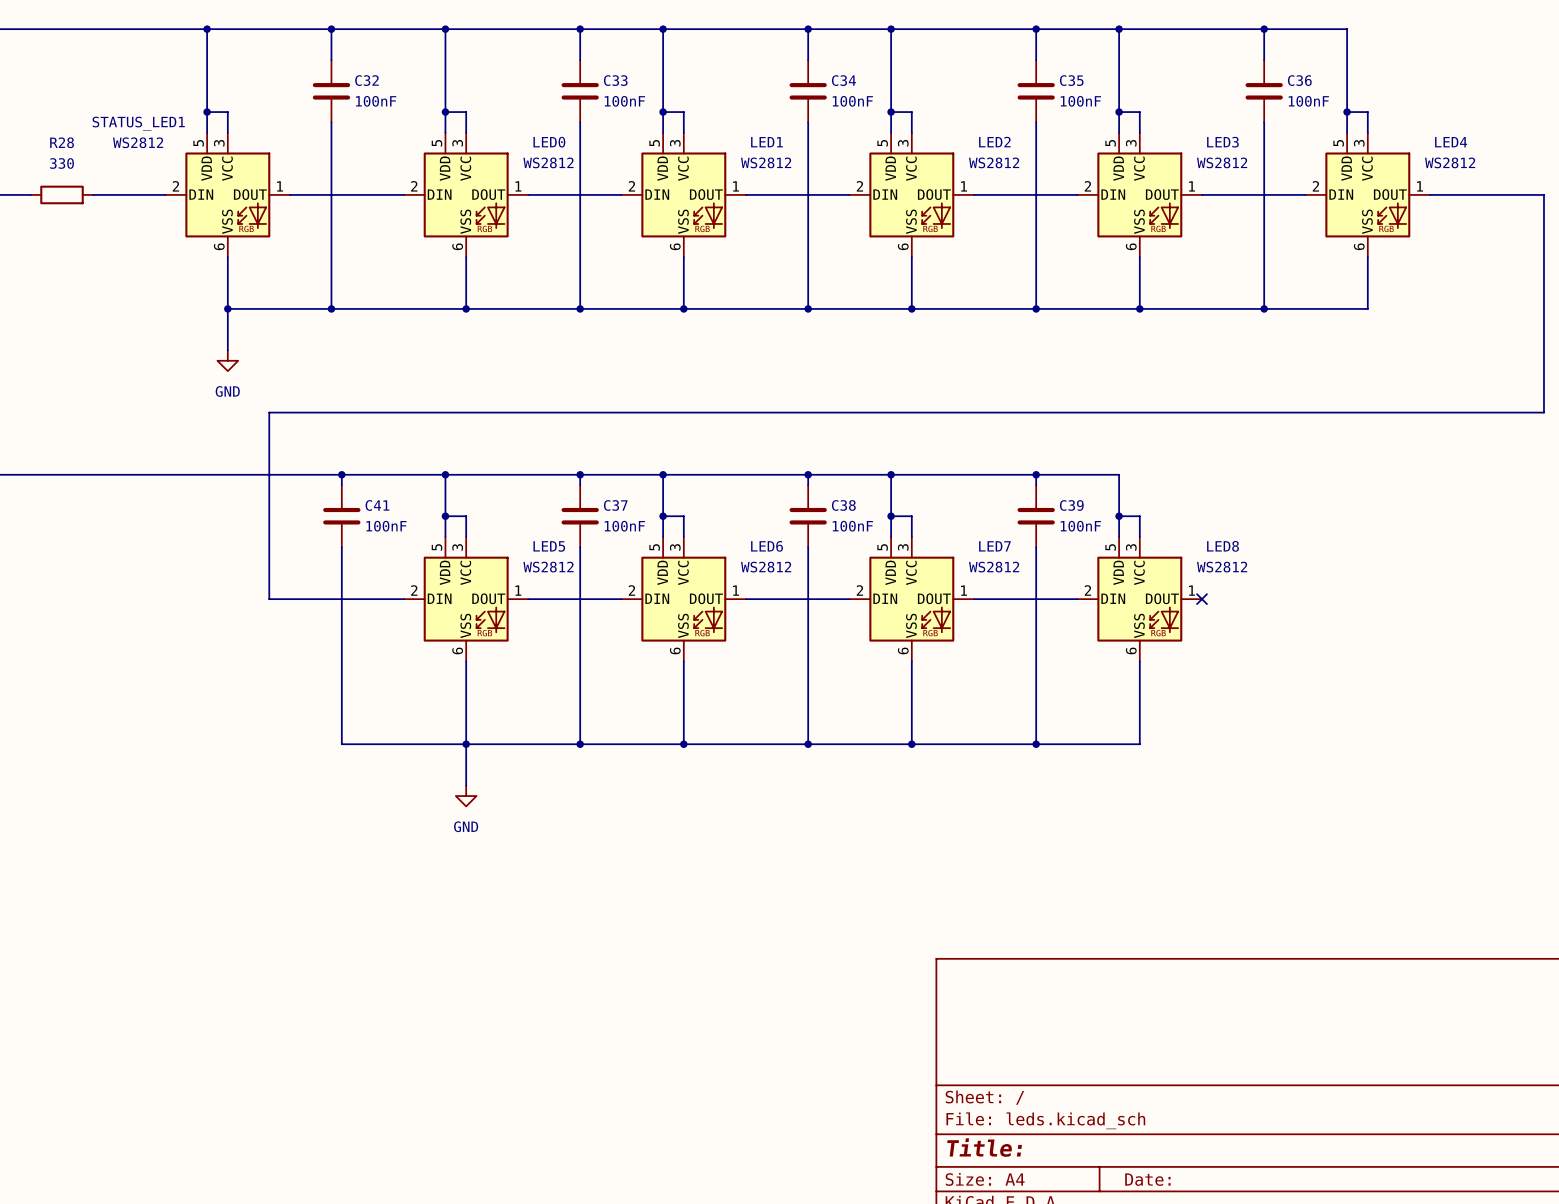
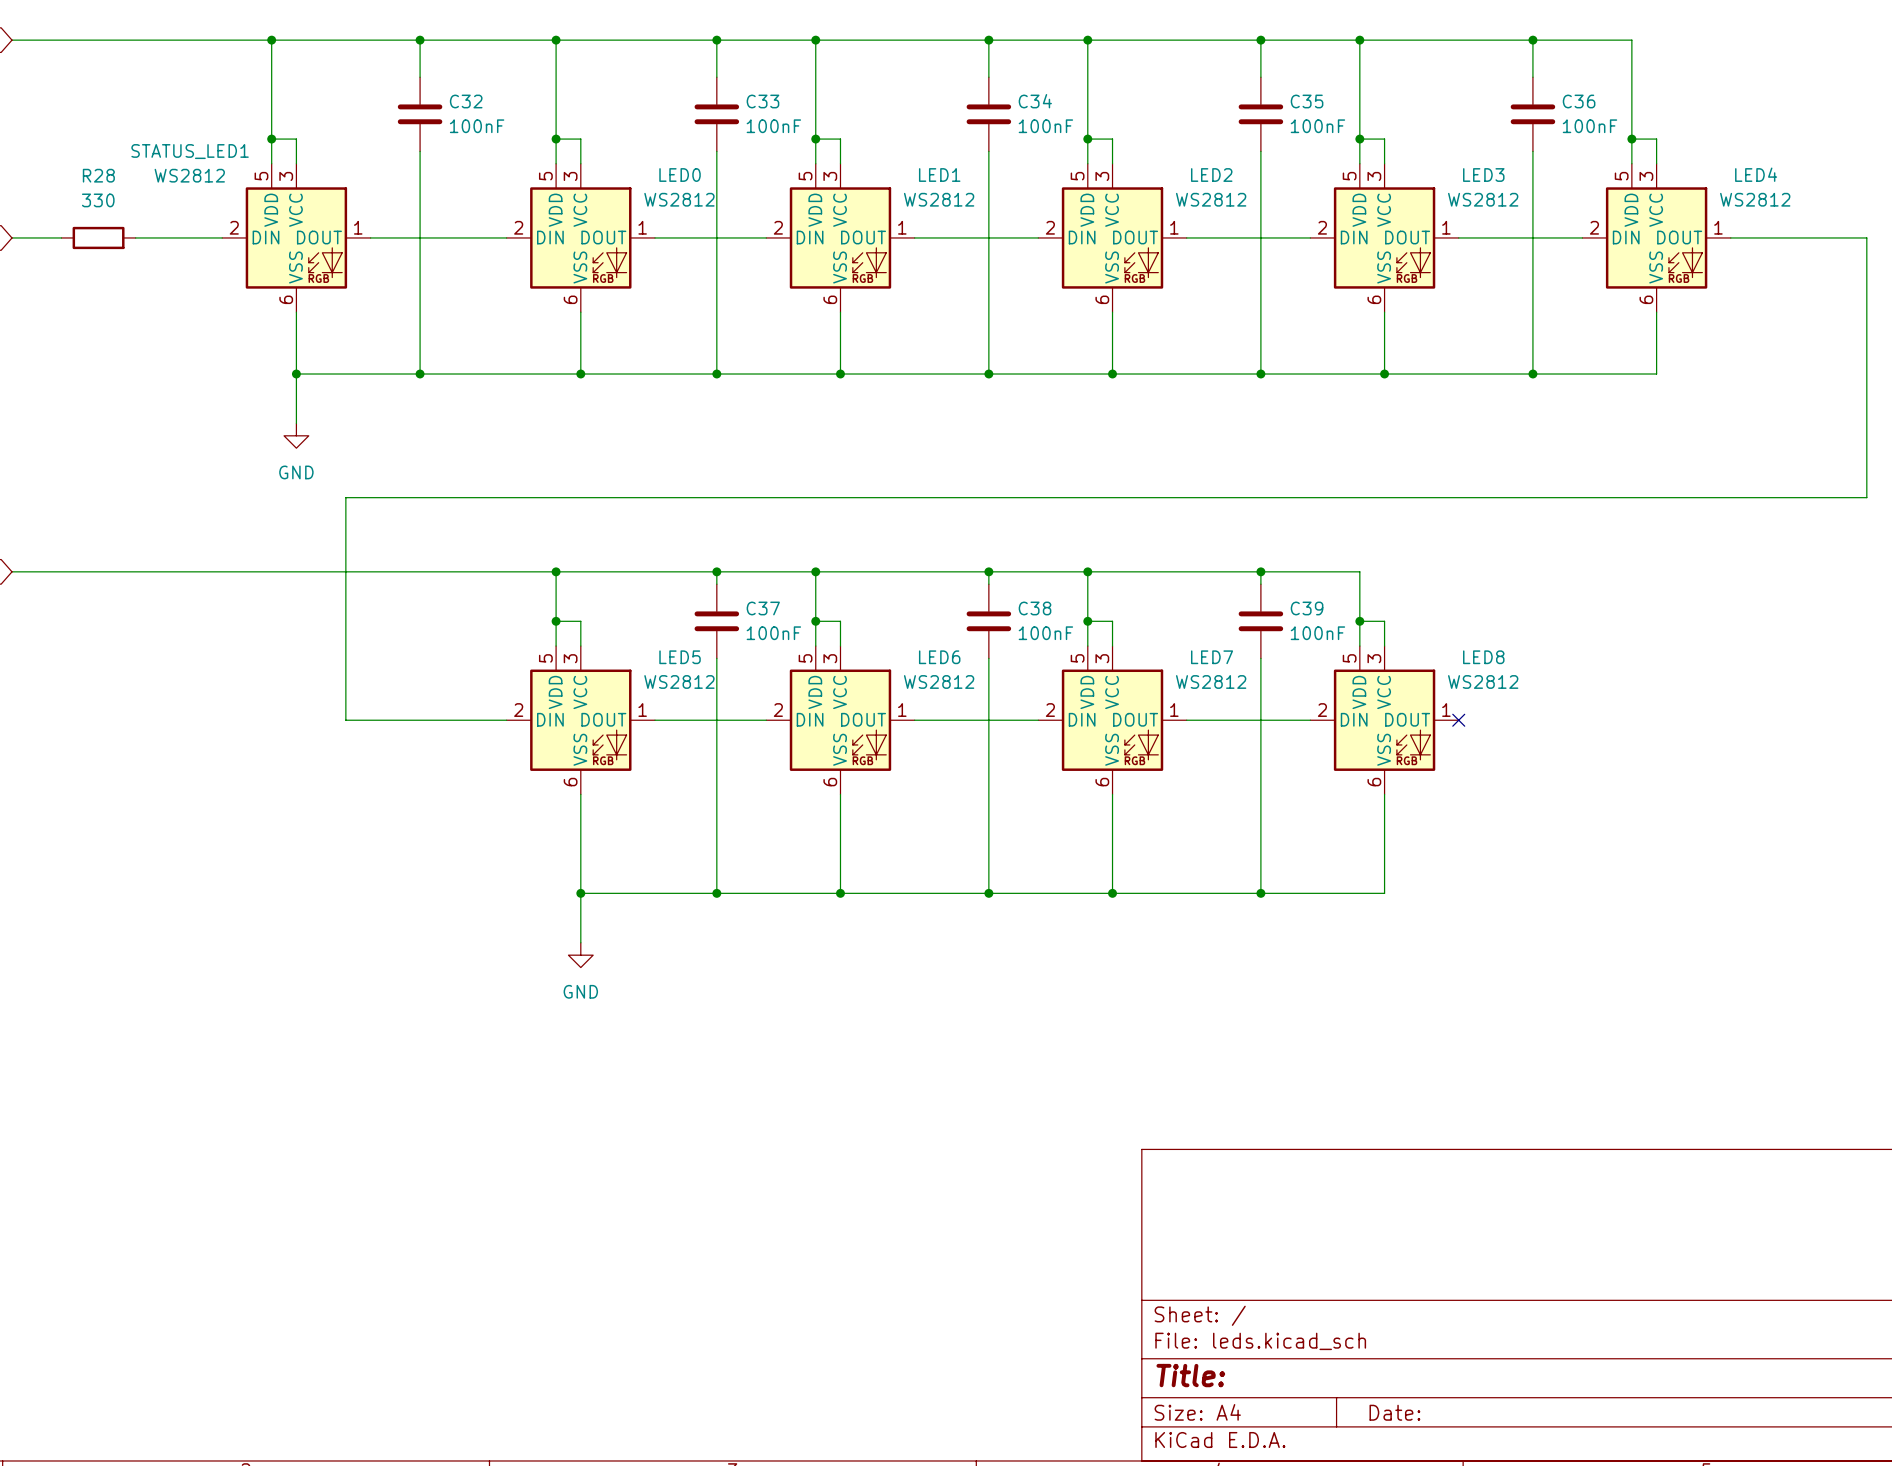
wire: (341, 474) (341, 485) -> none
junction: (341, 474) -> none
C41: 100nF (341, 516) -> none
wire: (341, 547) (341, 744) (466, 744) -> none

